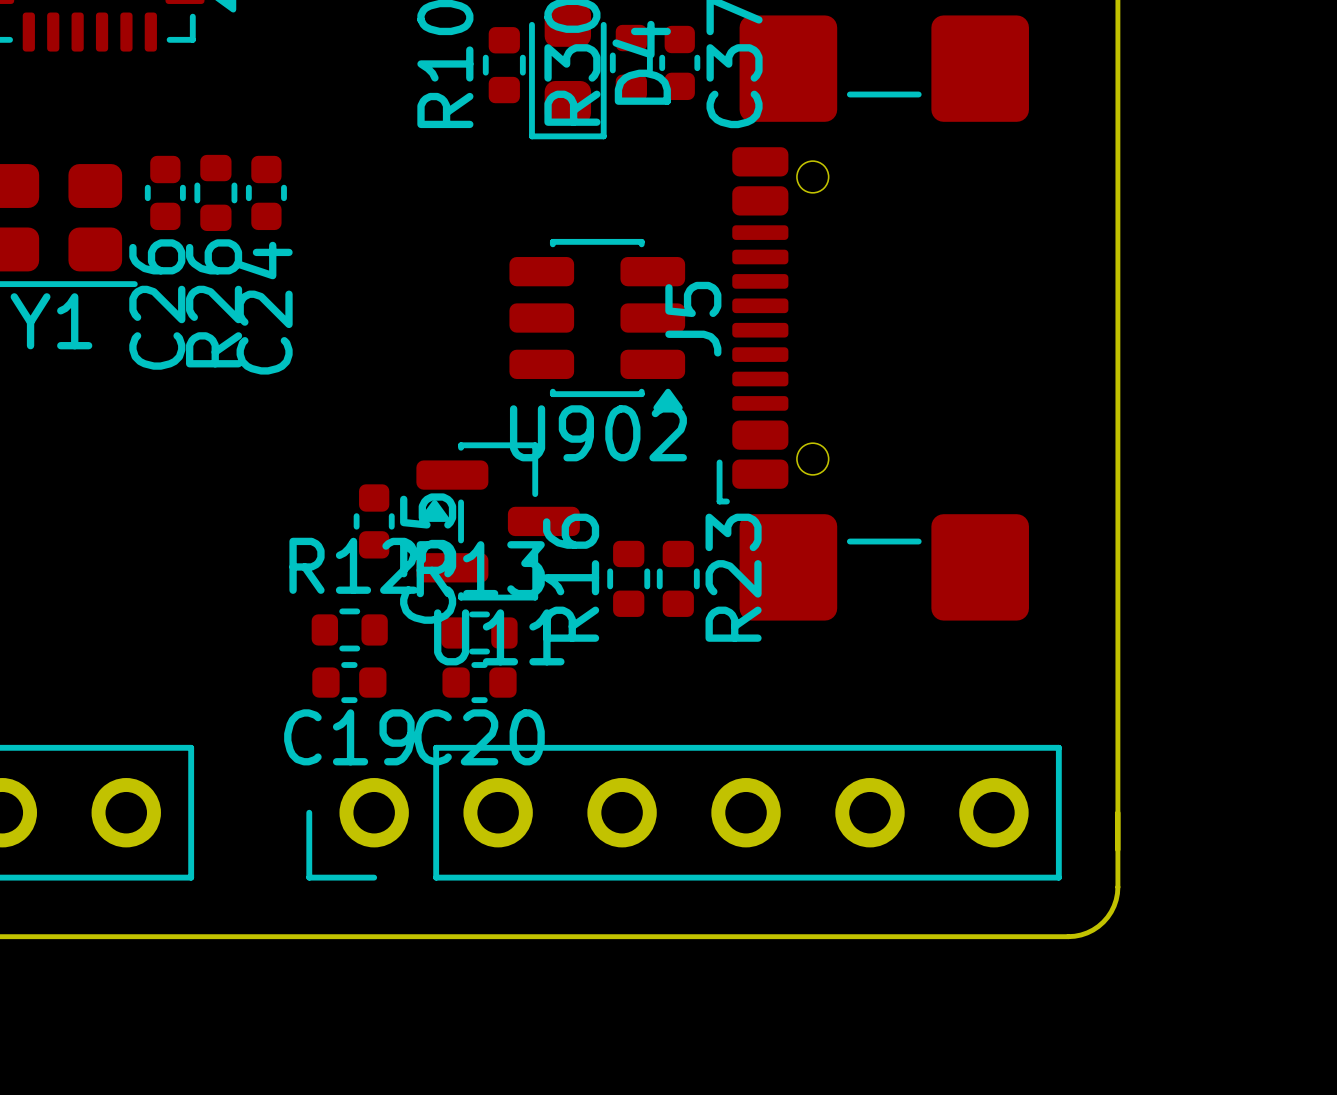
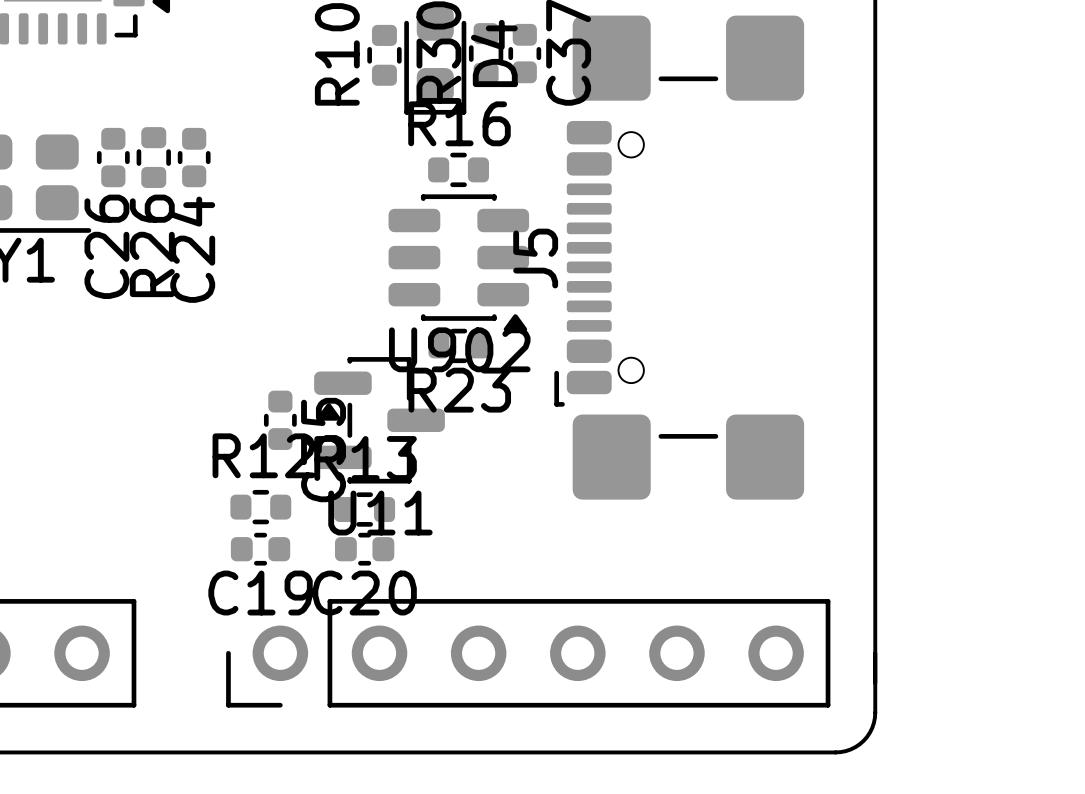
R16 rotation: 0° (628, 578) -> 90° clockwise (458, 169)
R16 position: (628, 578) -> (458, 169)
R23 rotation: 0° (678, 578) -> 90° clockwise (458, 345)
R23 position: (678, 578) -> (458, 345)

